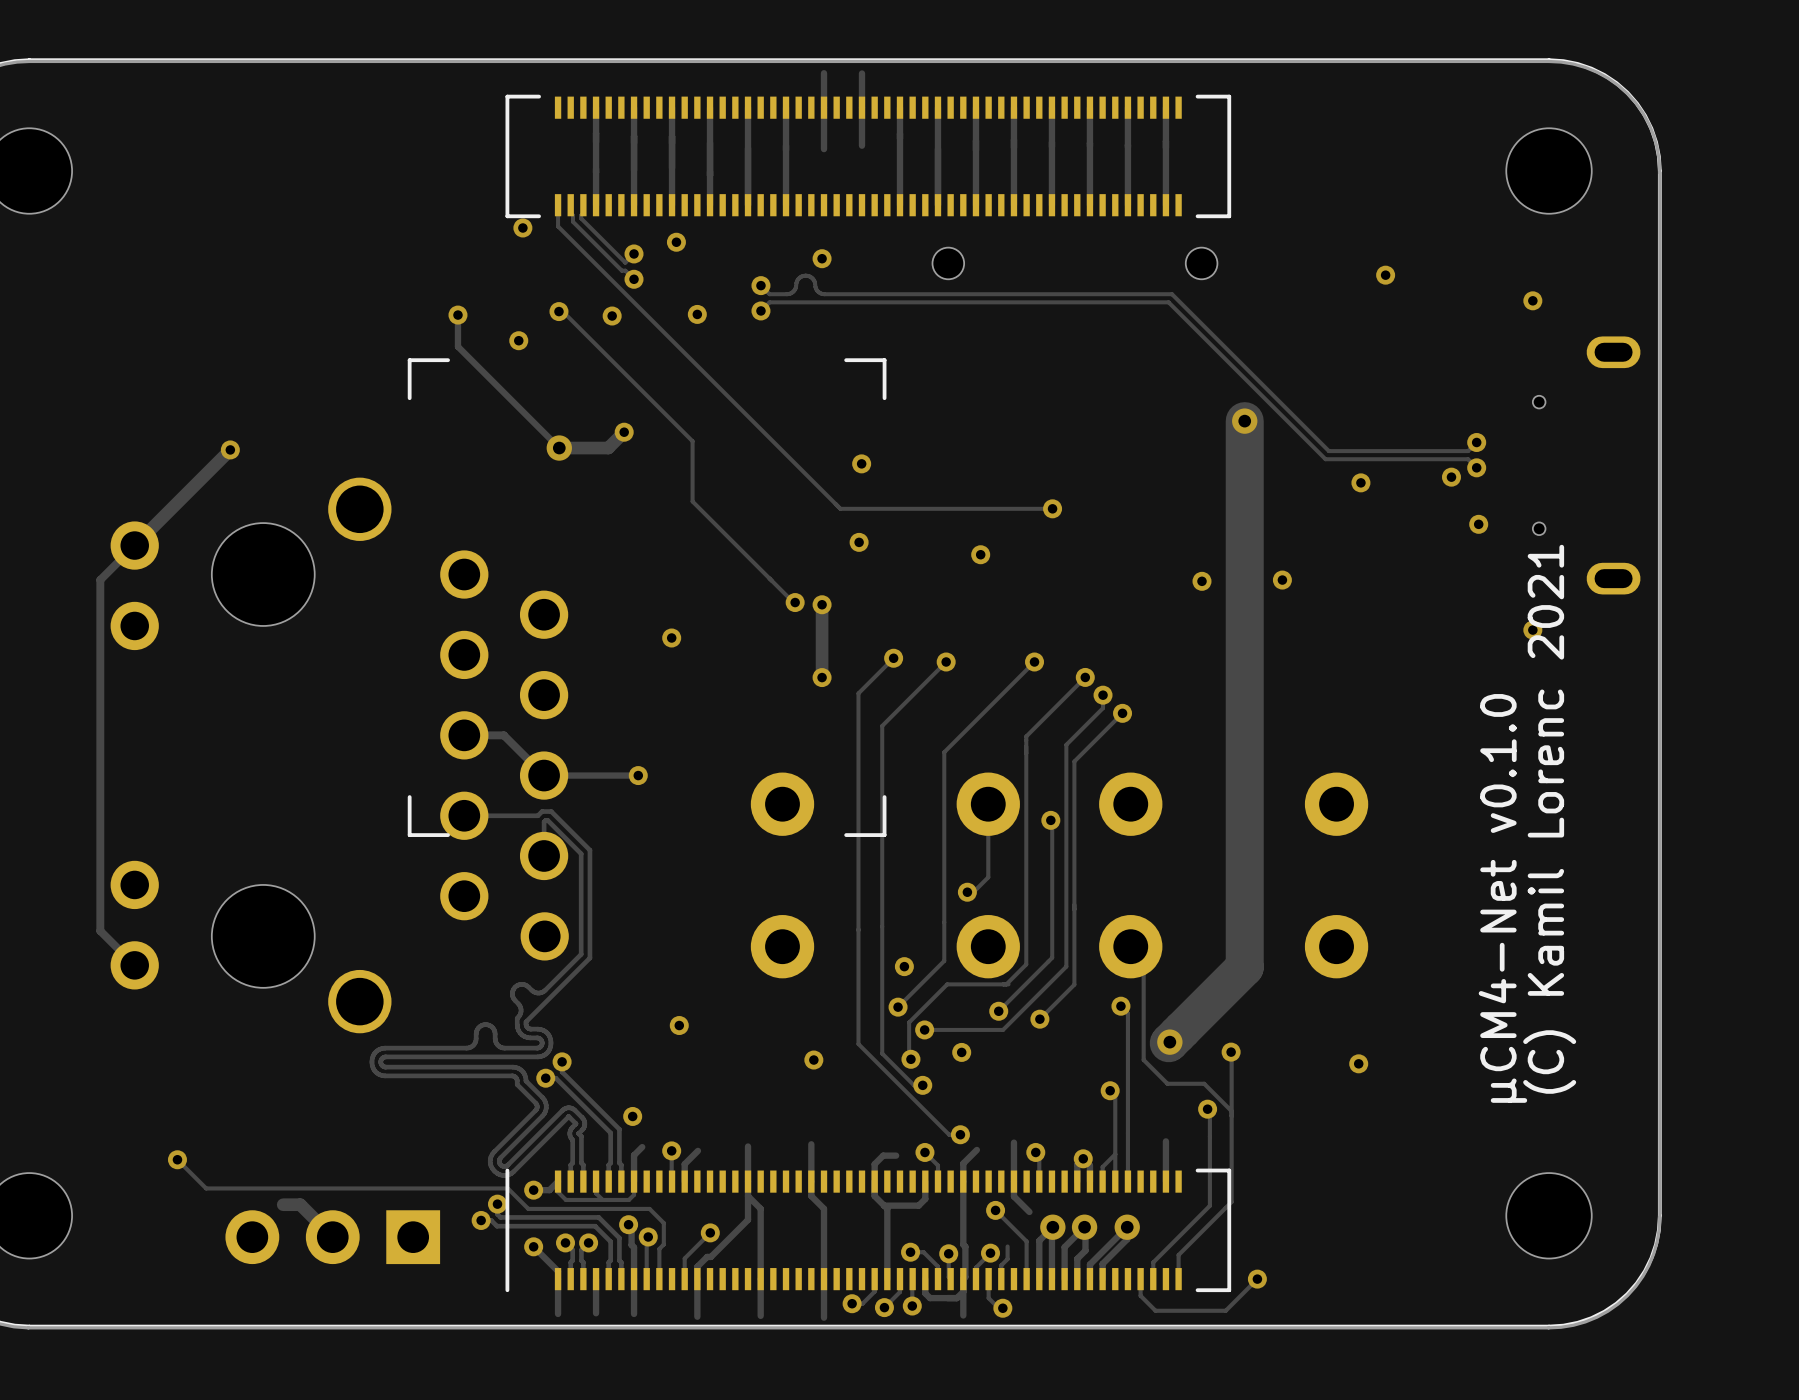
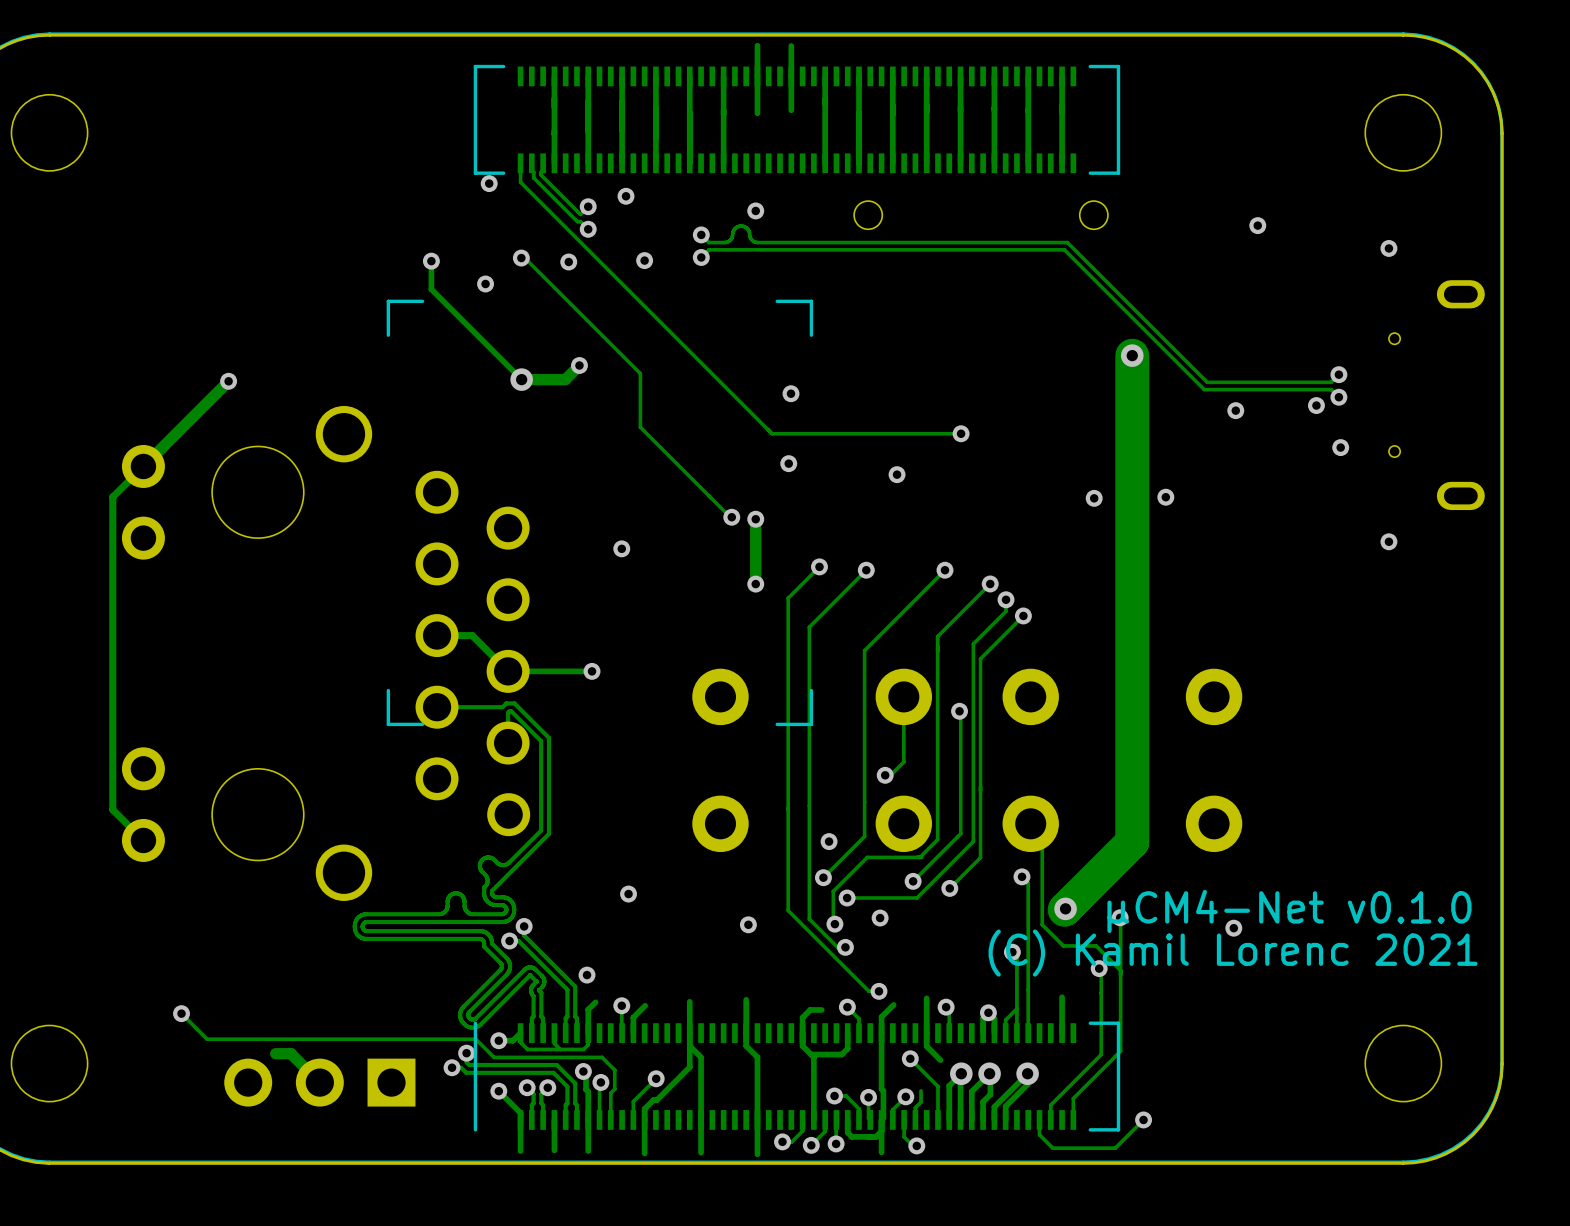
text rotation: 0° (1549, 819) -> 90° clockwise (1233, 953)
text rotation: 0° (1502, 898) -> 90° clockwise (1289, 911)

